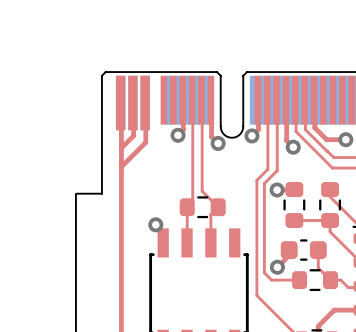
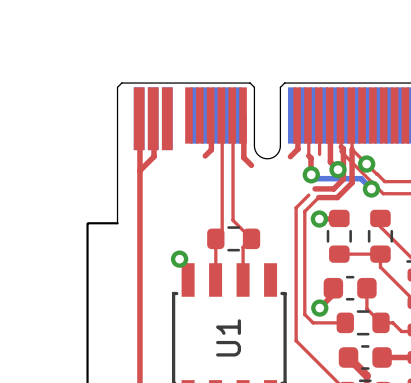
top track: (314, 99) (314, 127) (326, 139) (345, 139) -> none
top track: (145, 102) (145, 142) (121, 166) -> none
top track: none -> (341, 146) (343, 149) (343, 179) (333, 188) (315, 188)
top track: none -> (352, 149) (352, 182) (337, 197) (318, 197)
top track: (277, 133) (277, 170) -> none
via: (178, 135) -> none
via position: (251, 135) -> (311, 174)
top track: (267, 135) (267, 169) -> (308, 155) (310, 158) (311, 174)
via: (345, 139) -> none
via: none -> (366, 164)
via: (218, 143) -> none
bottom track: none -> (311, 174) (315, 178) (361, 178) (371, 189)
via: none -> (371, 189)
U1 name: none -> U1 (228, 337)
part: none -> (365, 357)
top track: (334, 310) (318, 326) -> (348, 357) (366, 375)

